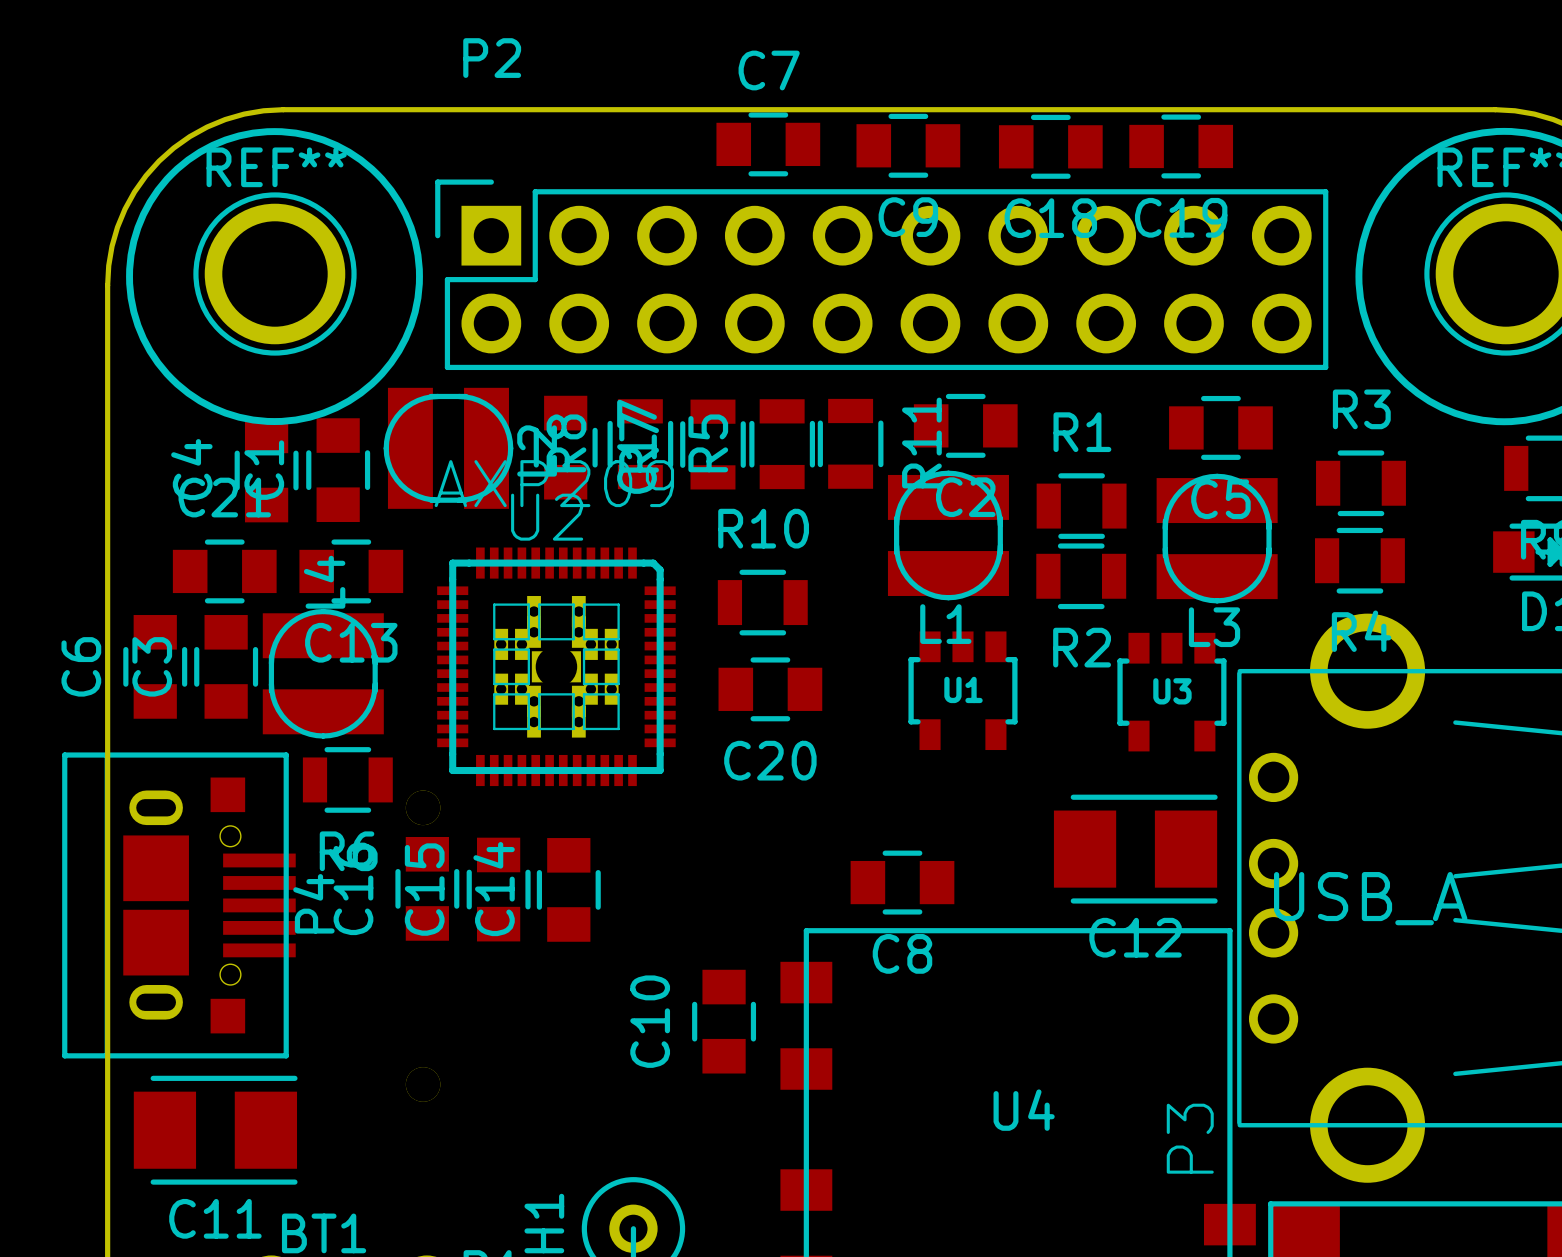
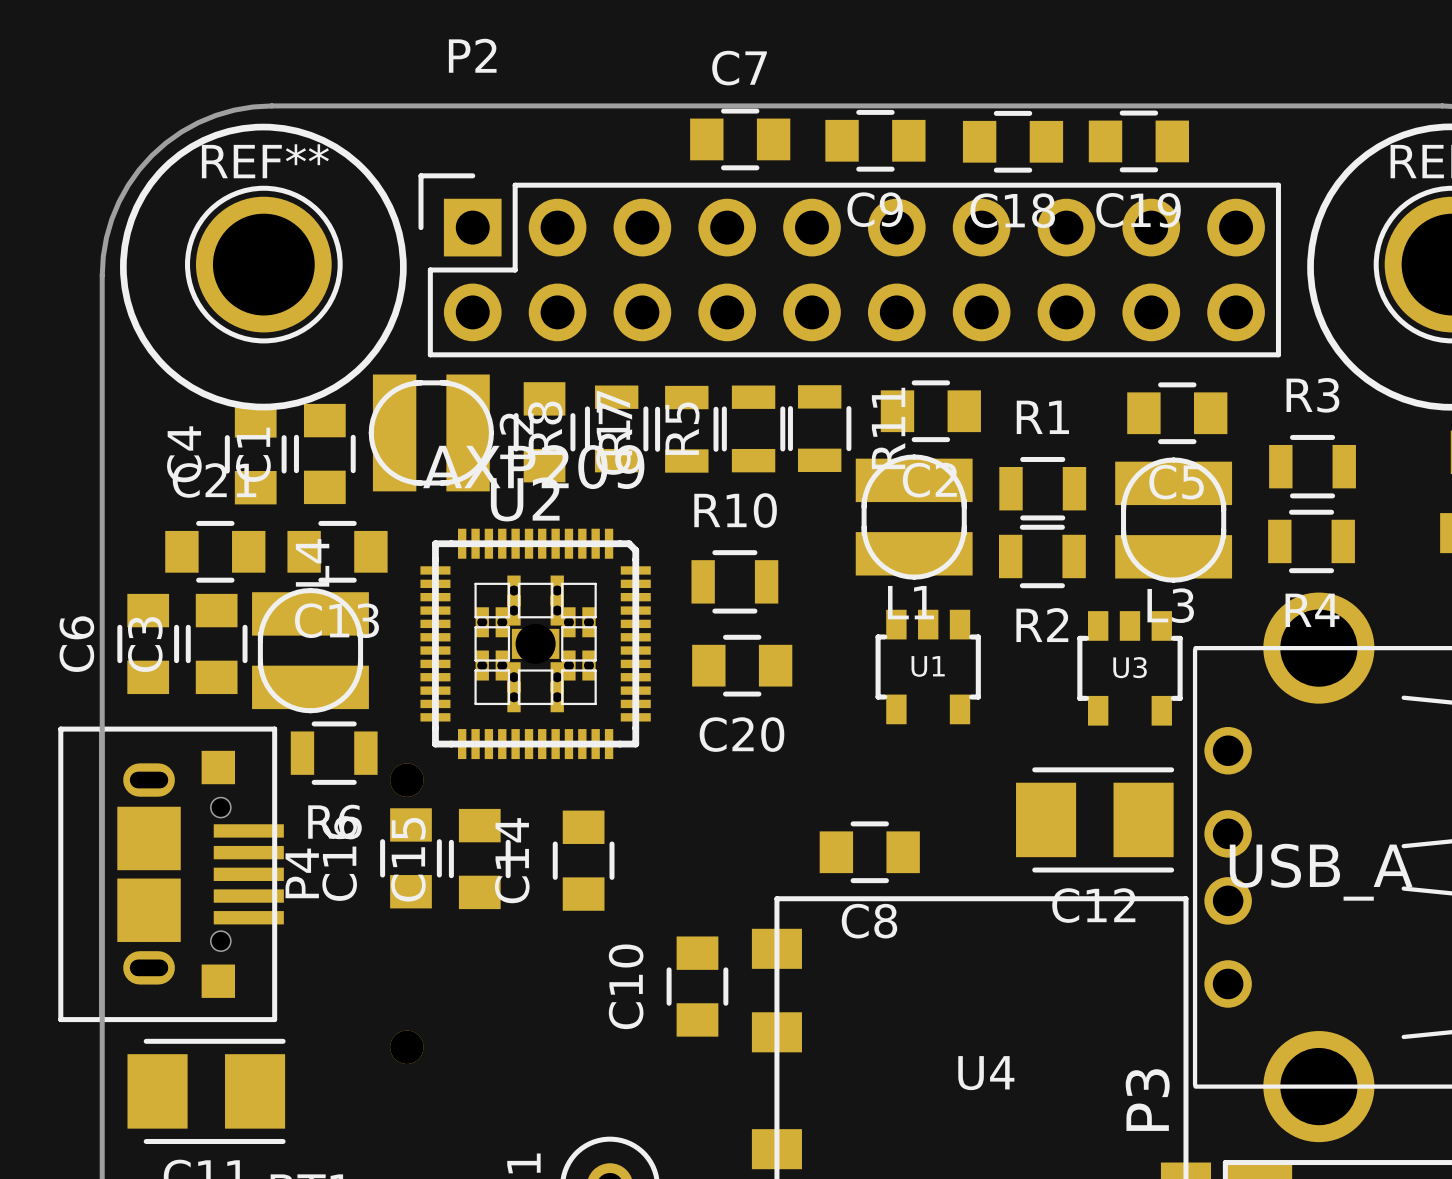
C14 position: (568, 889) -> (583, 860)

